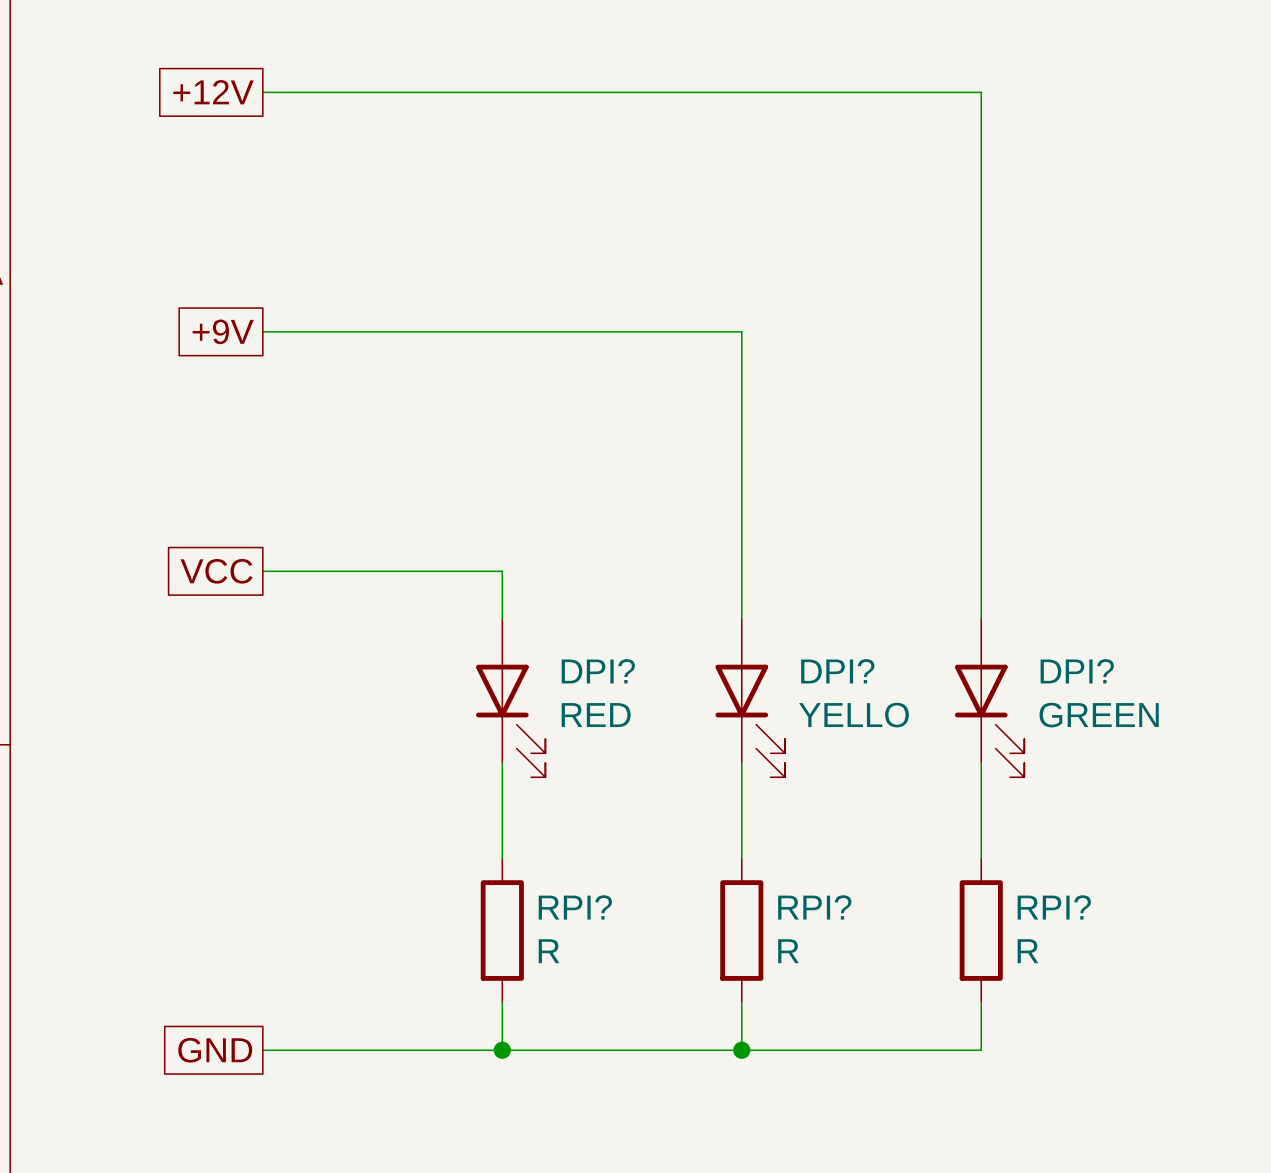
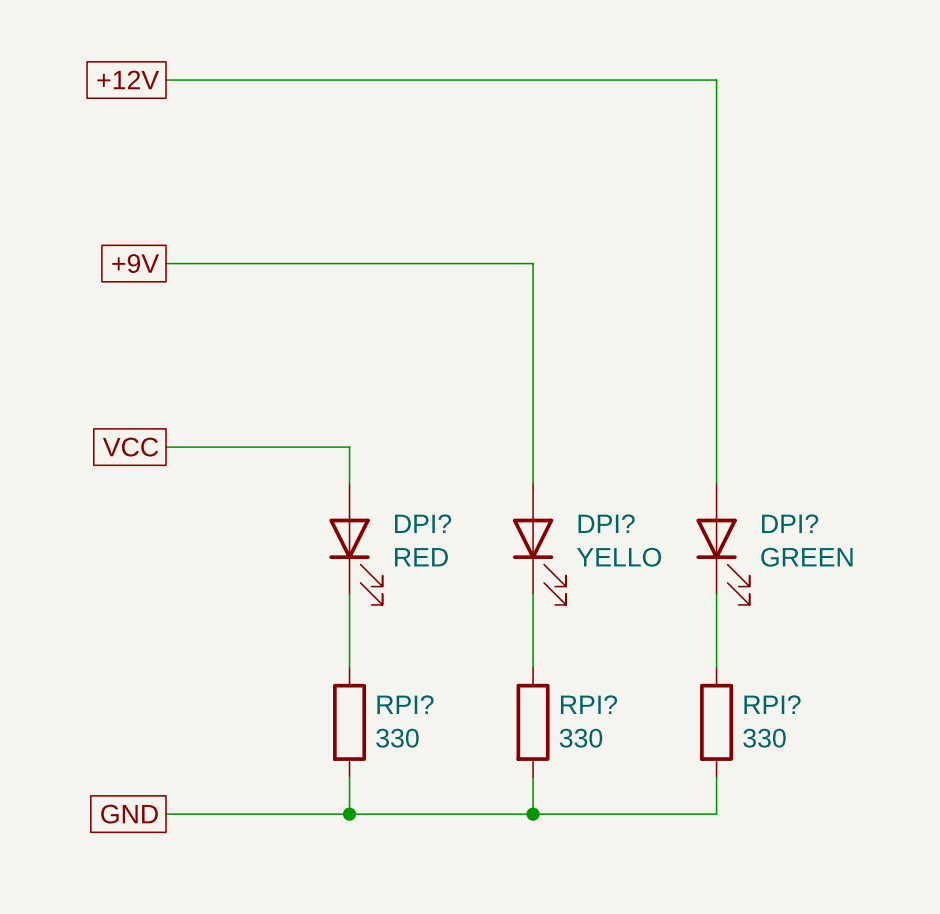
RPI? value: R (549, 951) -> 330 (397, 738)
RPI? value: R (788, 951) -> 330 (580, 738)
RPI? value: R (1027, 951) -> 330 (764, 738)

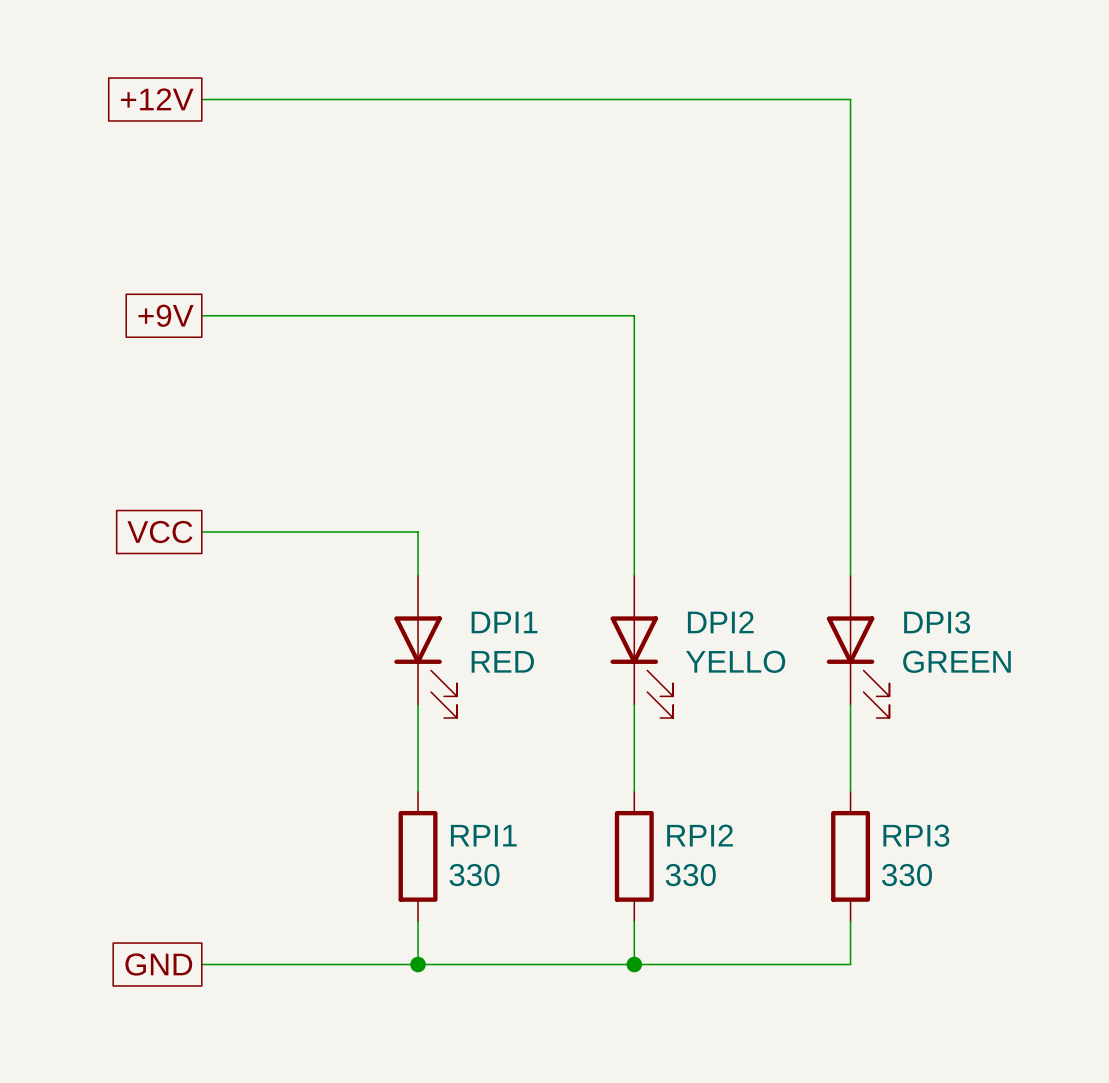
DPI? name: DPI? (423, 523) -> DPI1 (504, 622)
DPI? name: DPI? (606, 523) -> DPI2 (720, 622)
DPI? name: DPI? (790, 523) -> DPI3 (937, 622)
RPI? name: RPI? (405, 704) -> RPI1 (483, 835)
RPI? name: RPI? (588, 704) -> RPI2 (700, 835)
RPI? name: RPI? (772, 704) -> RPI3 (916, 835)

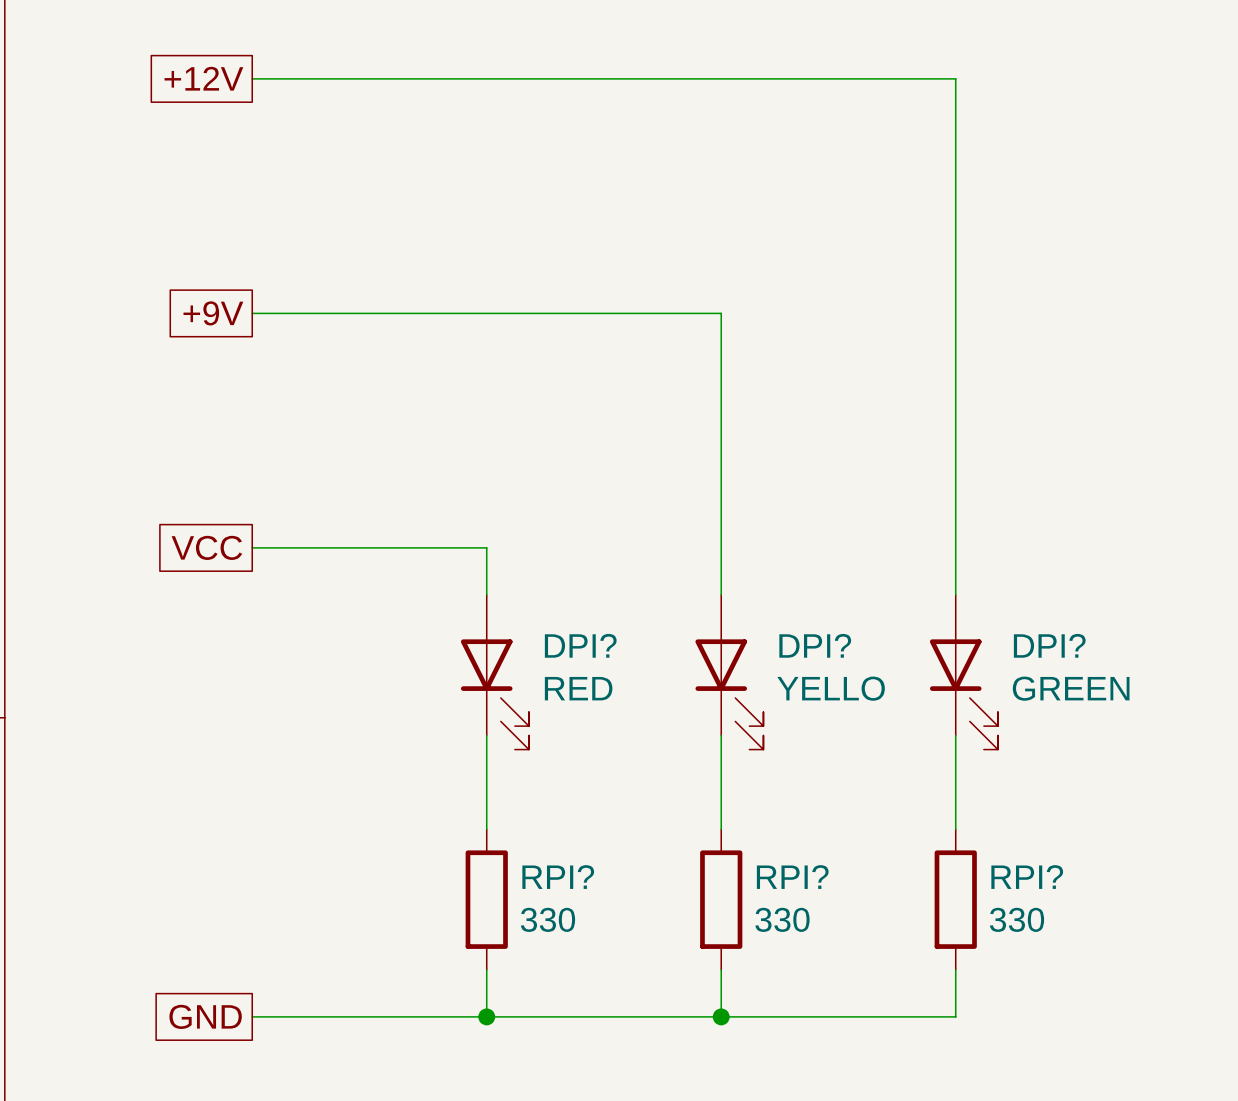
DPI1 name: DPI1 (504, 622) -> DPI? (580, 645)
DPI2 name: DPI2 (720, 622) -> DPI? (815, 645)
DPI3 name: DPI3 (937, 622) -> DPI? (1049, 645)
RPI1 name: RPI1 (483, 835) -> RPI? (558, 877)
RPI2 name: RPI2 (700, 835) -> RPI? (792, 877)
RPI3 name: RPI3 (916, 835) -> RPI? (1027, 877)

